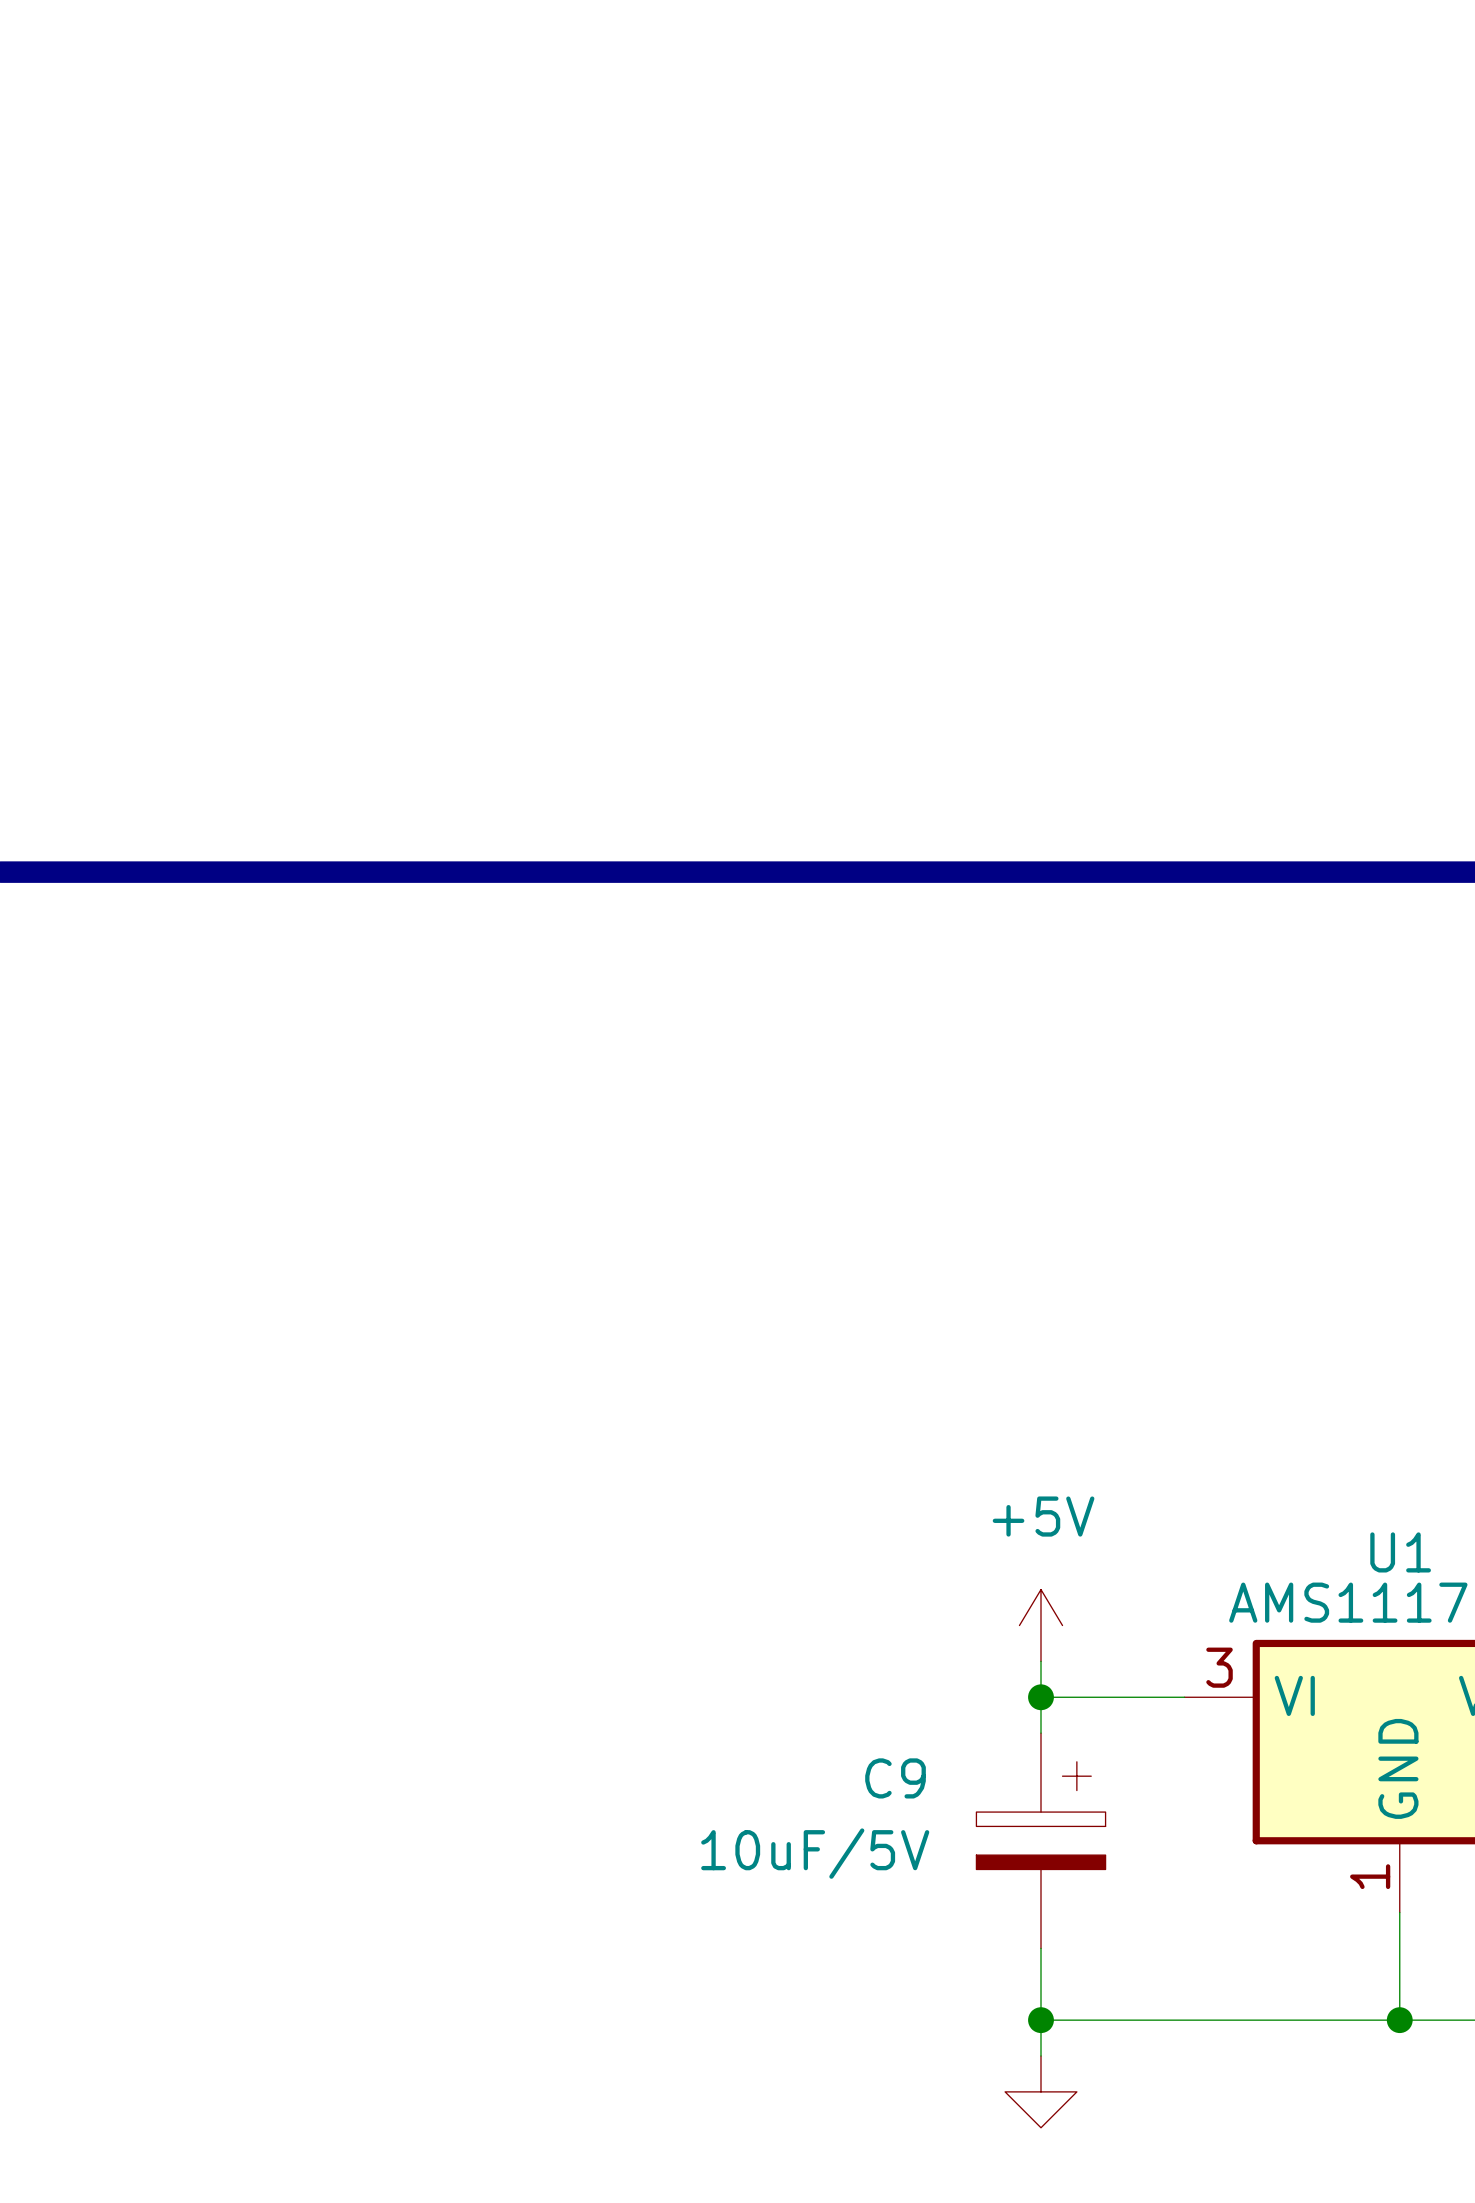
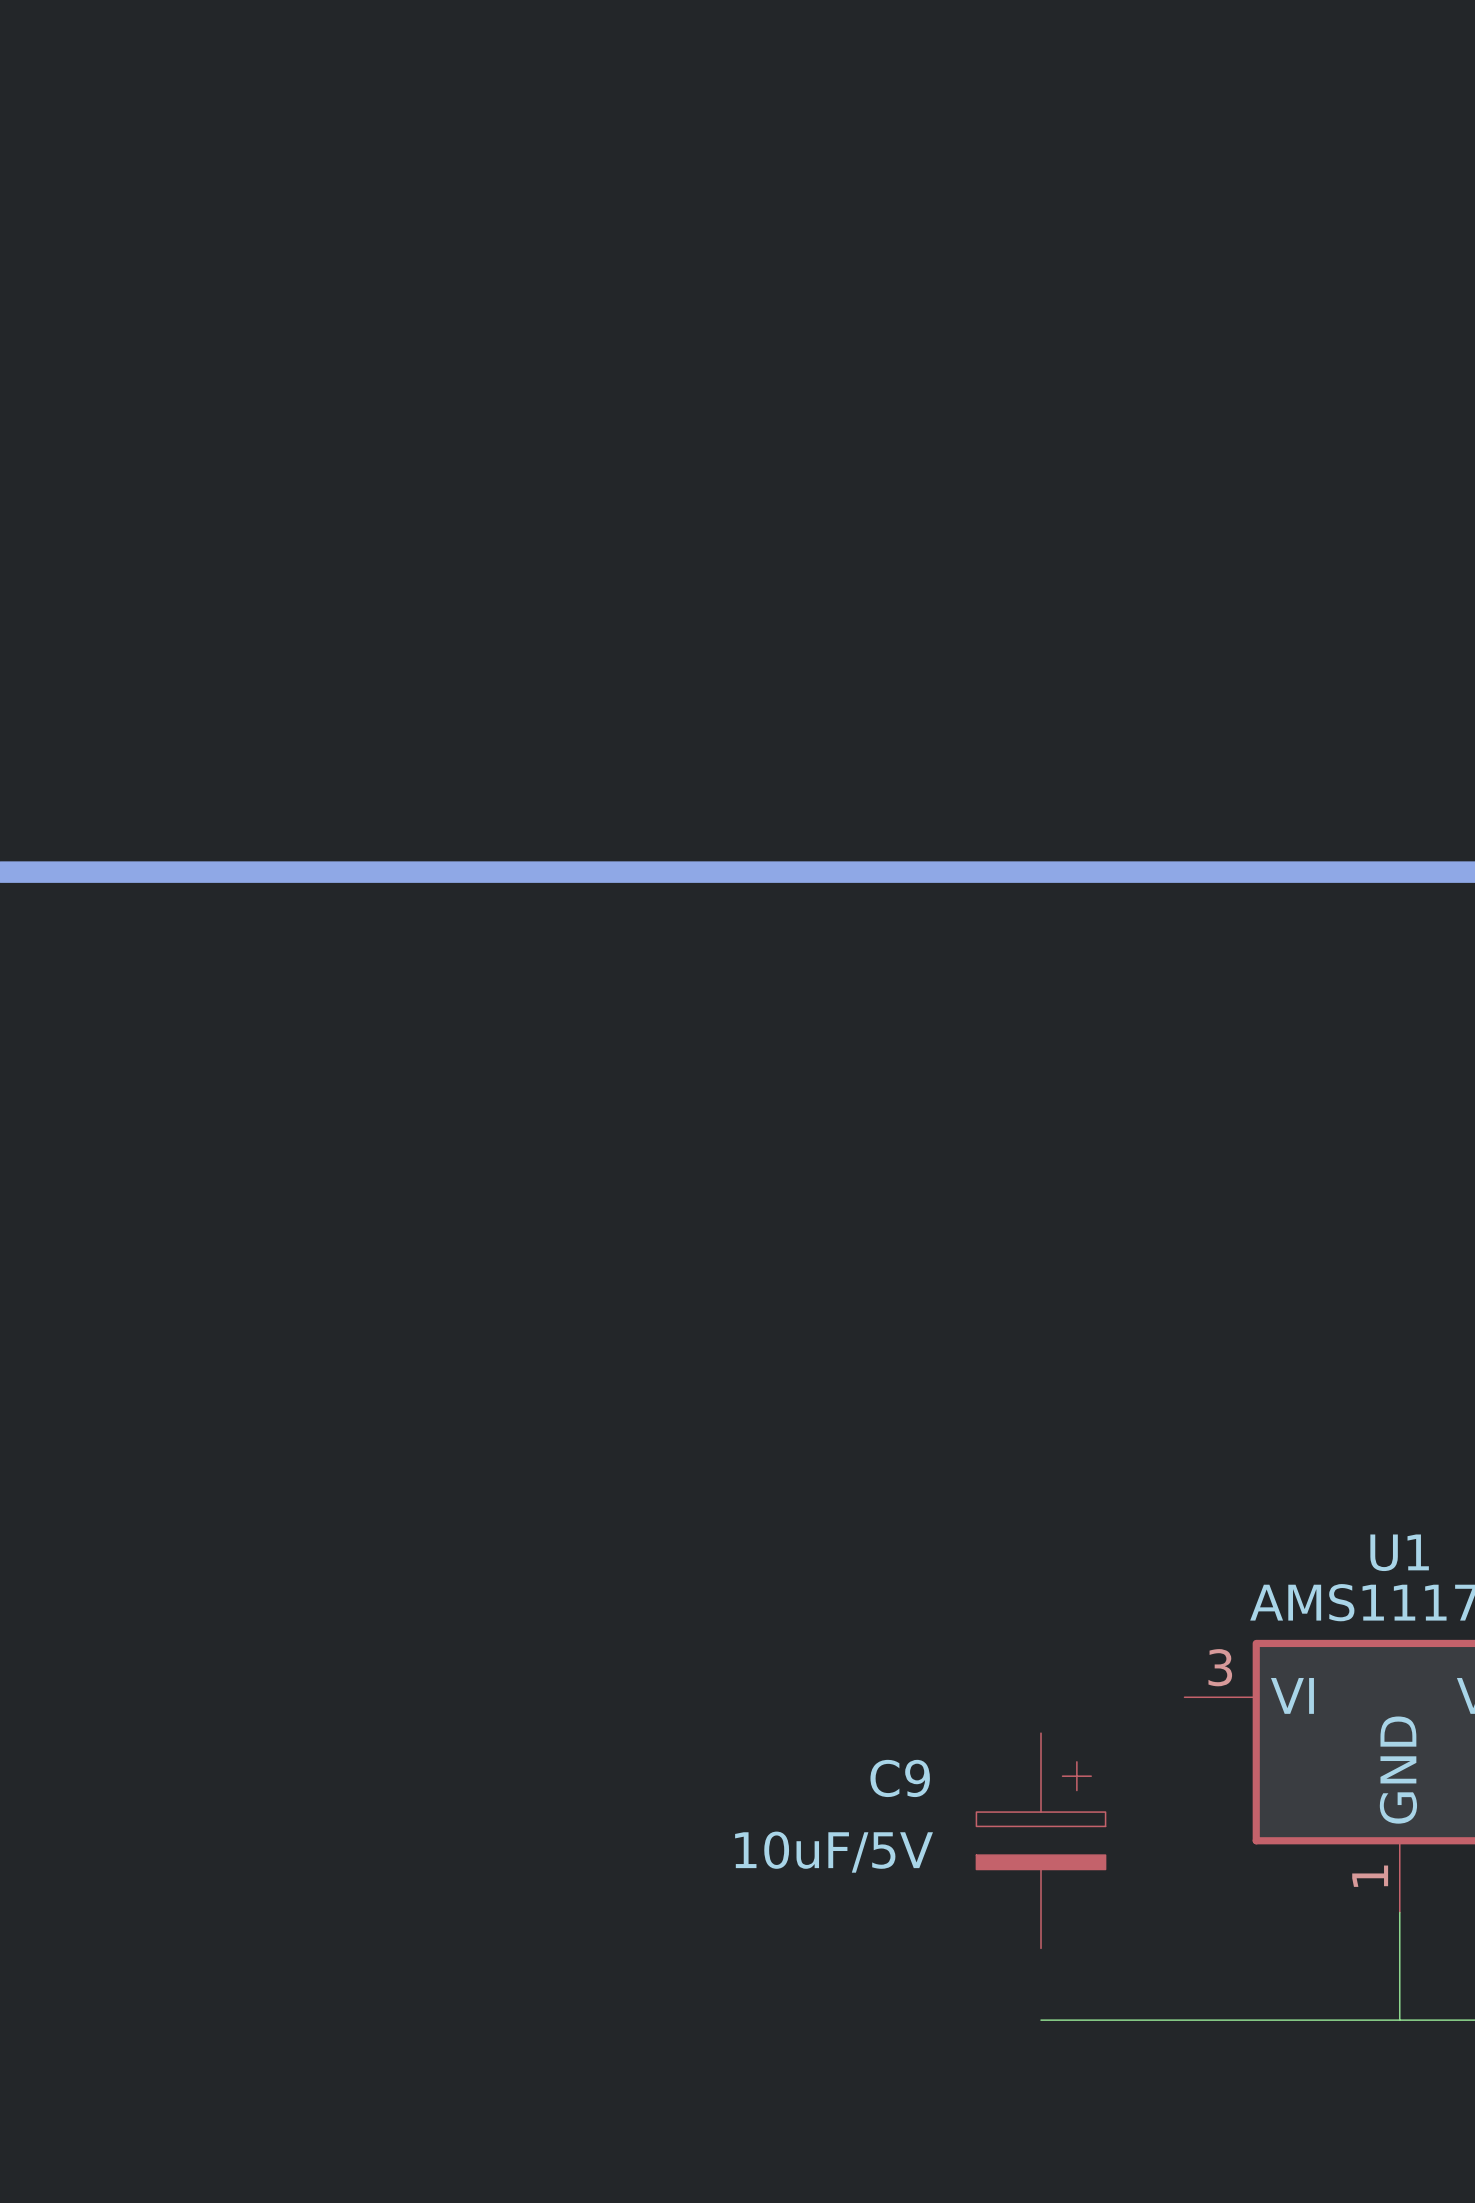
power symbol: +5V (1041, 1625) -> none
wire: (1041, 1661) (1041, 1733) -> none
wire: (1041, 1697) (1184, 1697) -> none
junction: (1041, 1697) -> none
wire: (1041, 1948) (1041, 2056) -> none
junction: (1041, 2020) -> none
junction: (1399, 2020) -> none
power symbol: (1041, 2091) -> none

